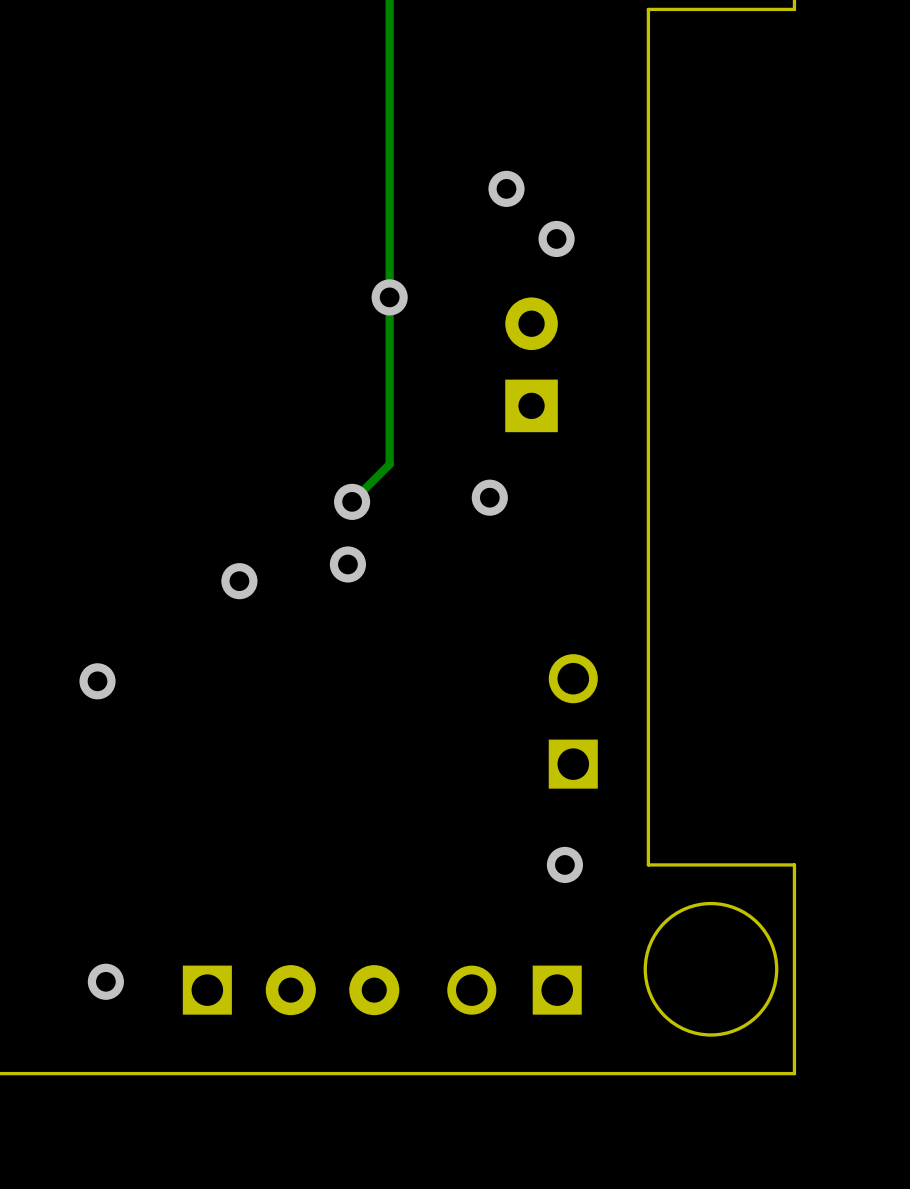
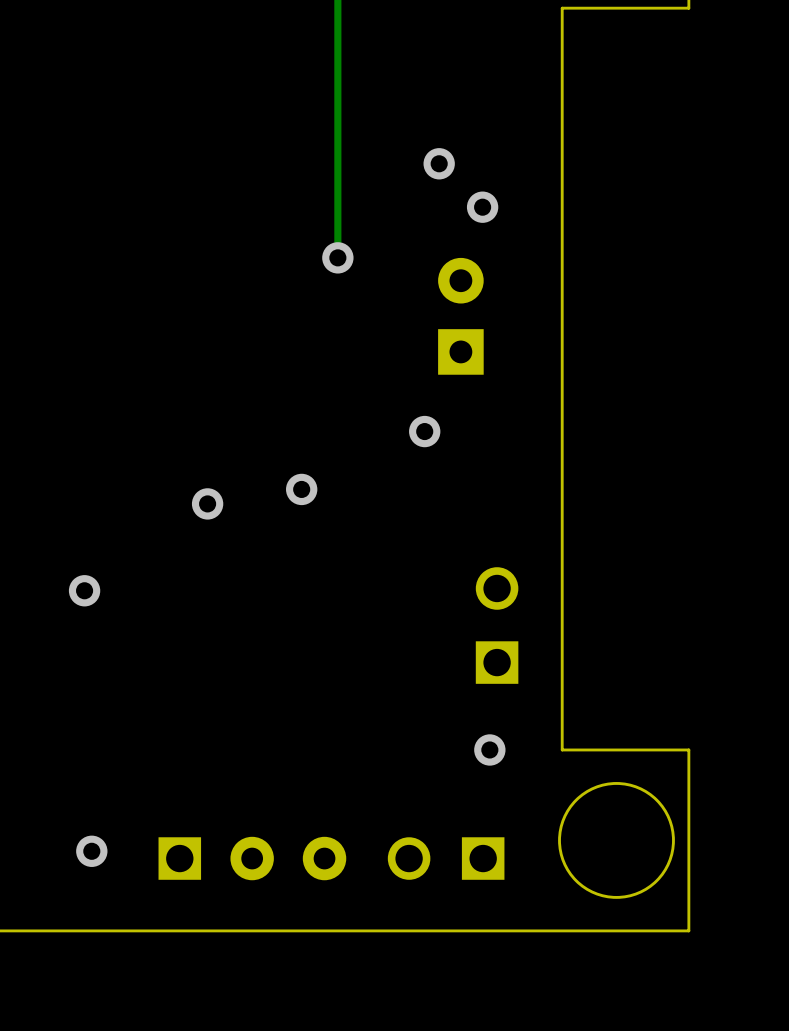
track: (389, 297) (389, 464) (352, 501) -> none
via: (352, 501) -> none

